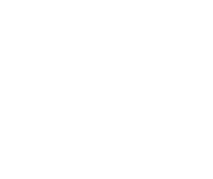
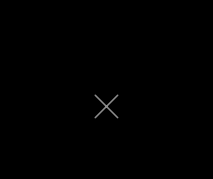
no-connect mark: none -> (106, 106)

